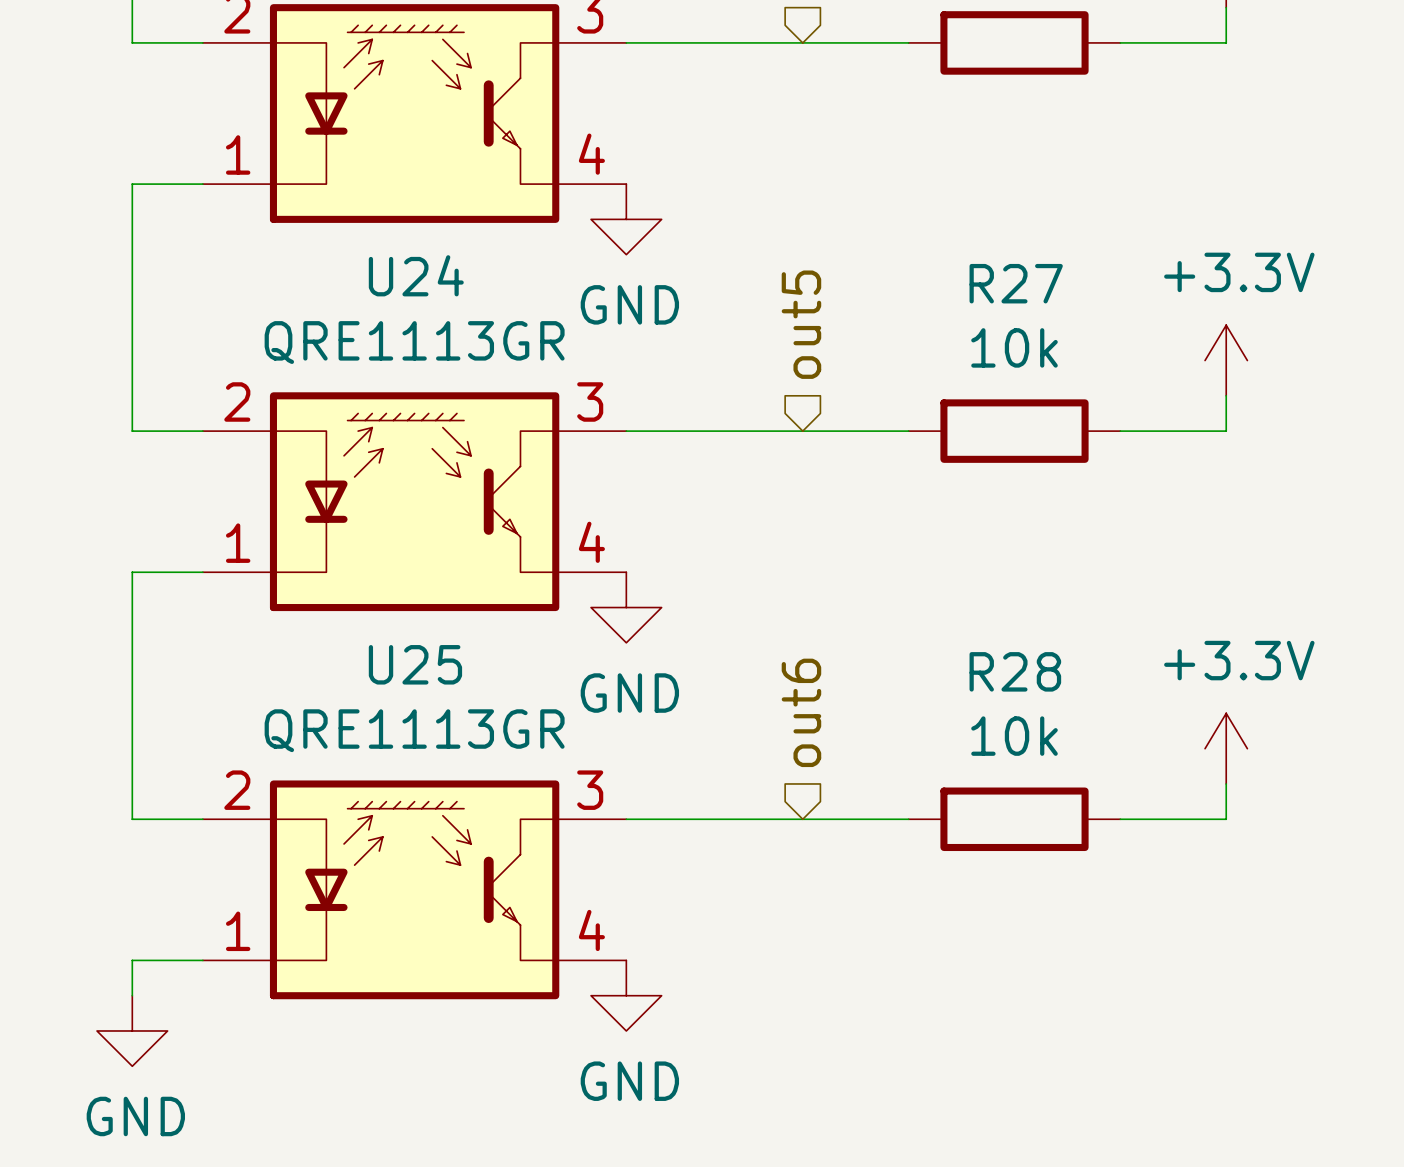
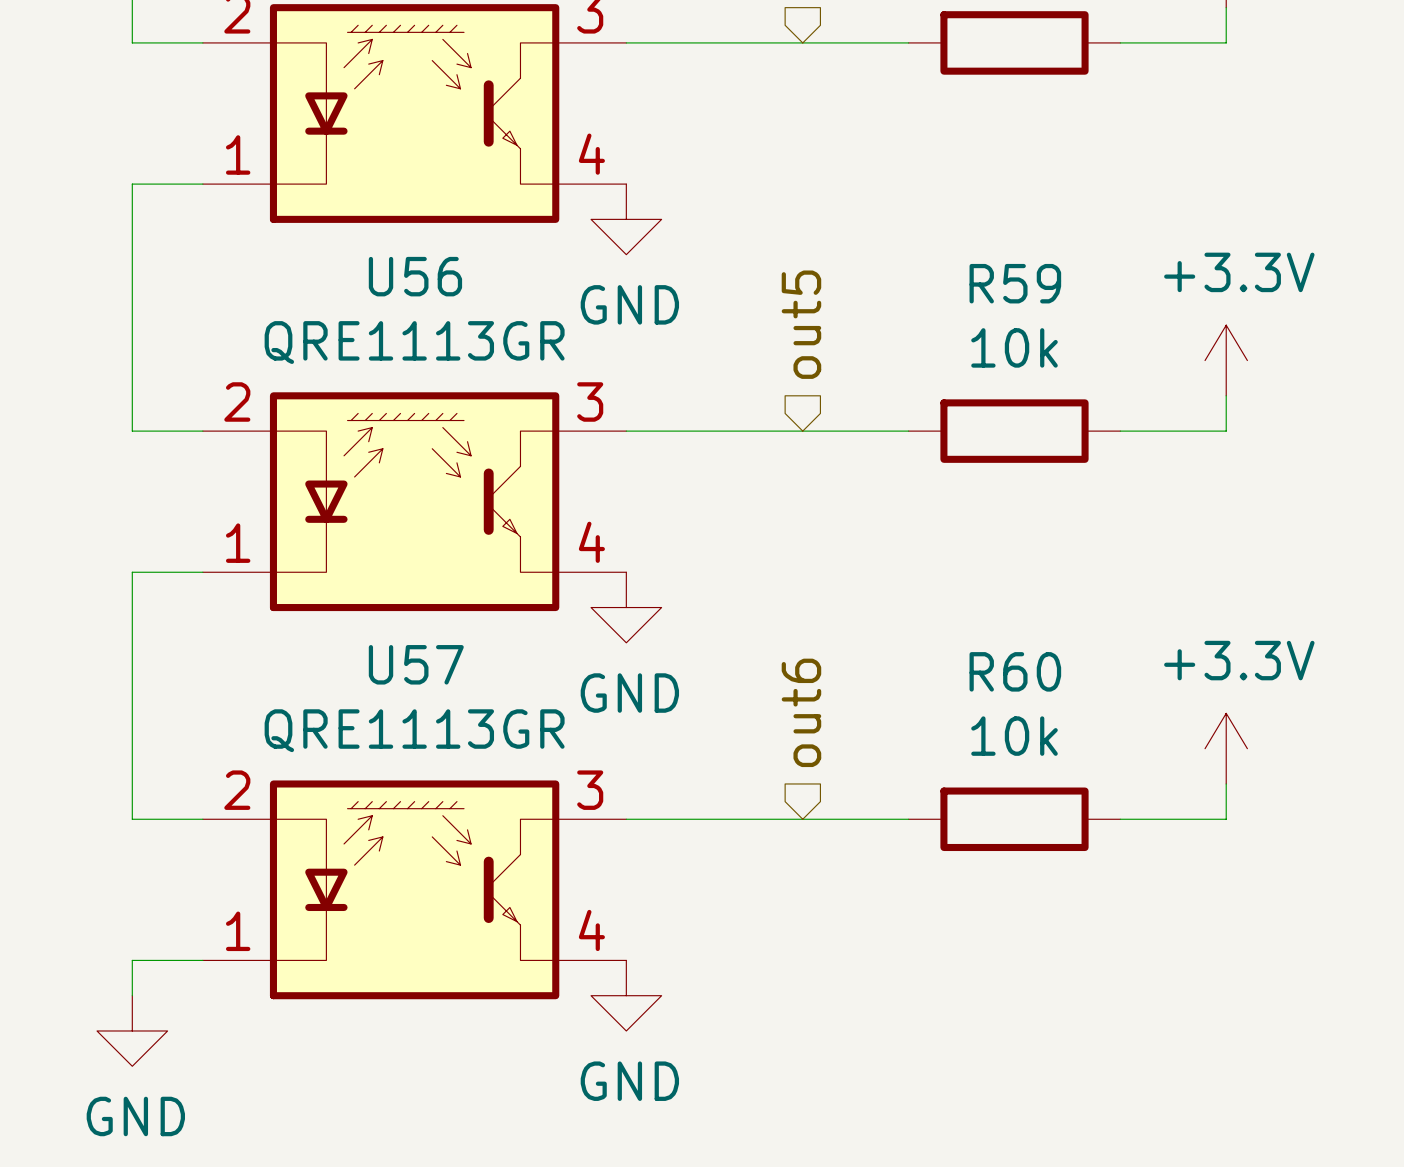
U24 name: U24 (416, 275) -> U56 (415, 276)
R27 name: R27 (1016, 283) -> R59 (1015, 283)
U25 name: U25 (415, 664) -> U57 (416, 664)
R28 name: R28 (1015, 671) -> R60 (1015, 671)

